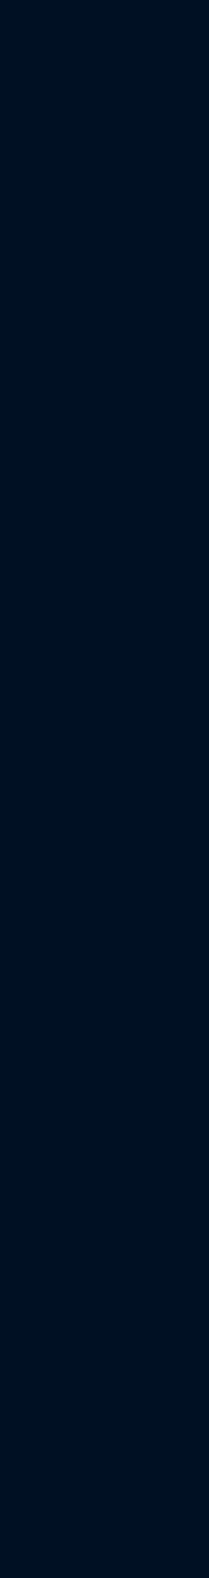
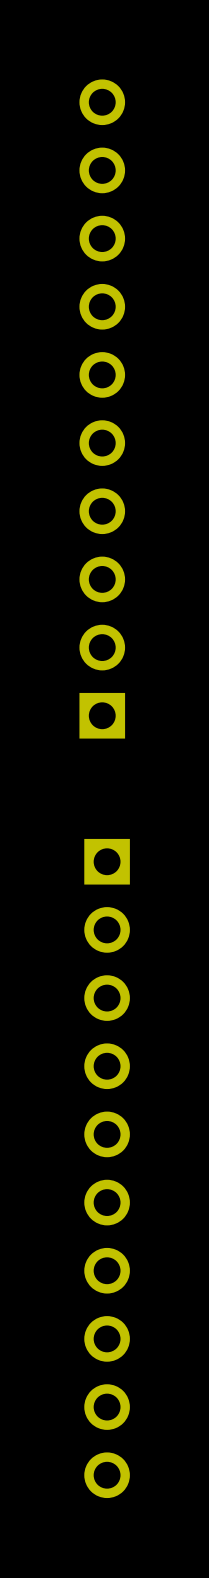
part: none -> (102, 409)
part: none -> (107, 1168)

